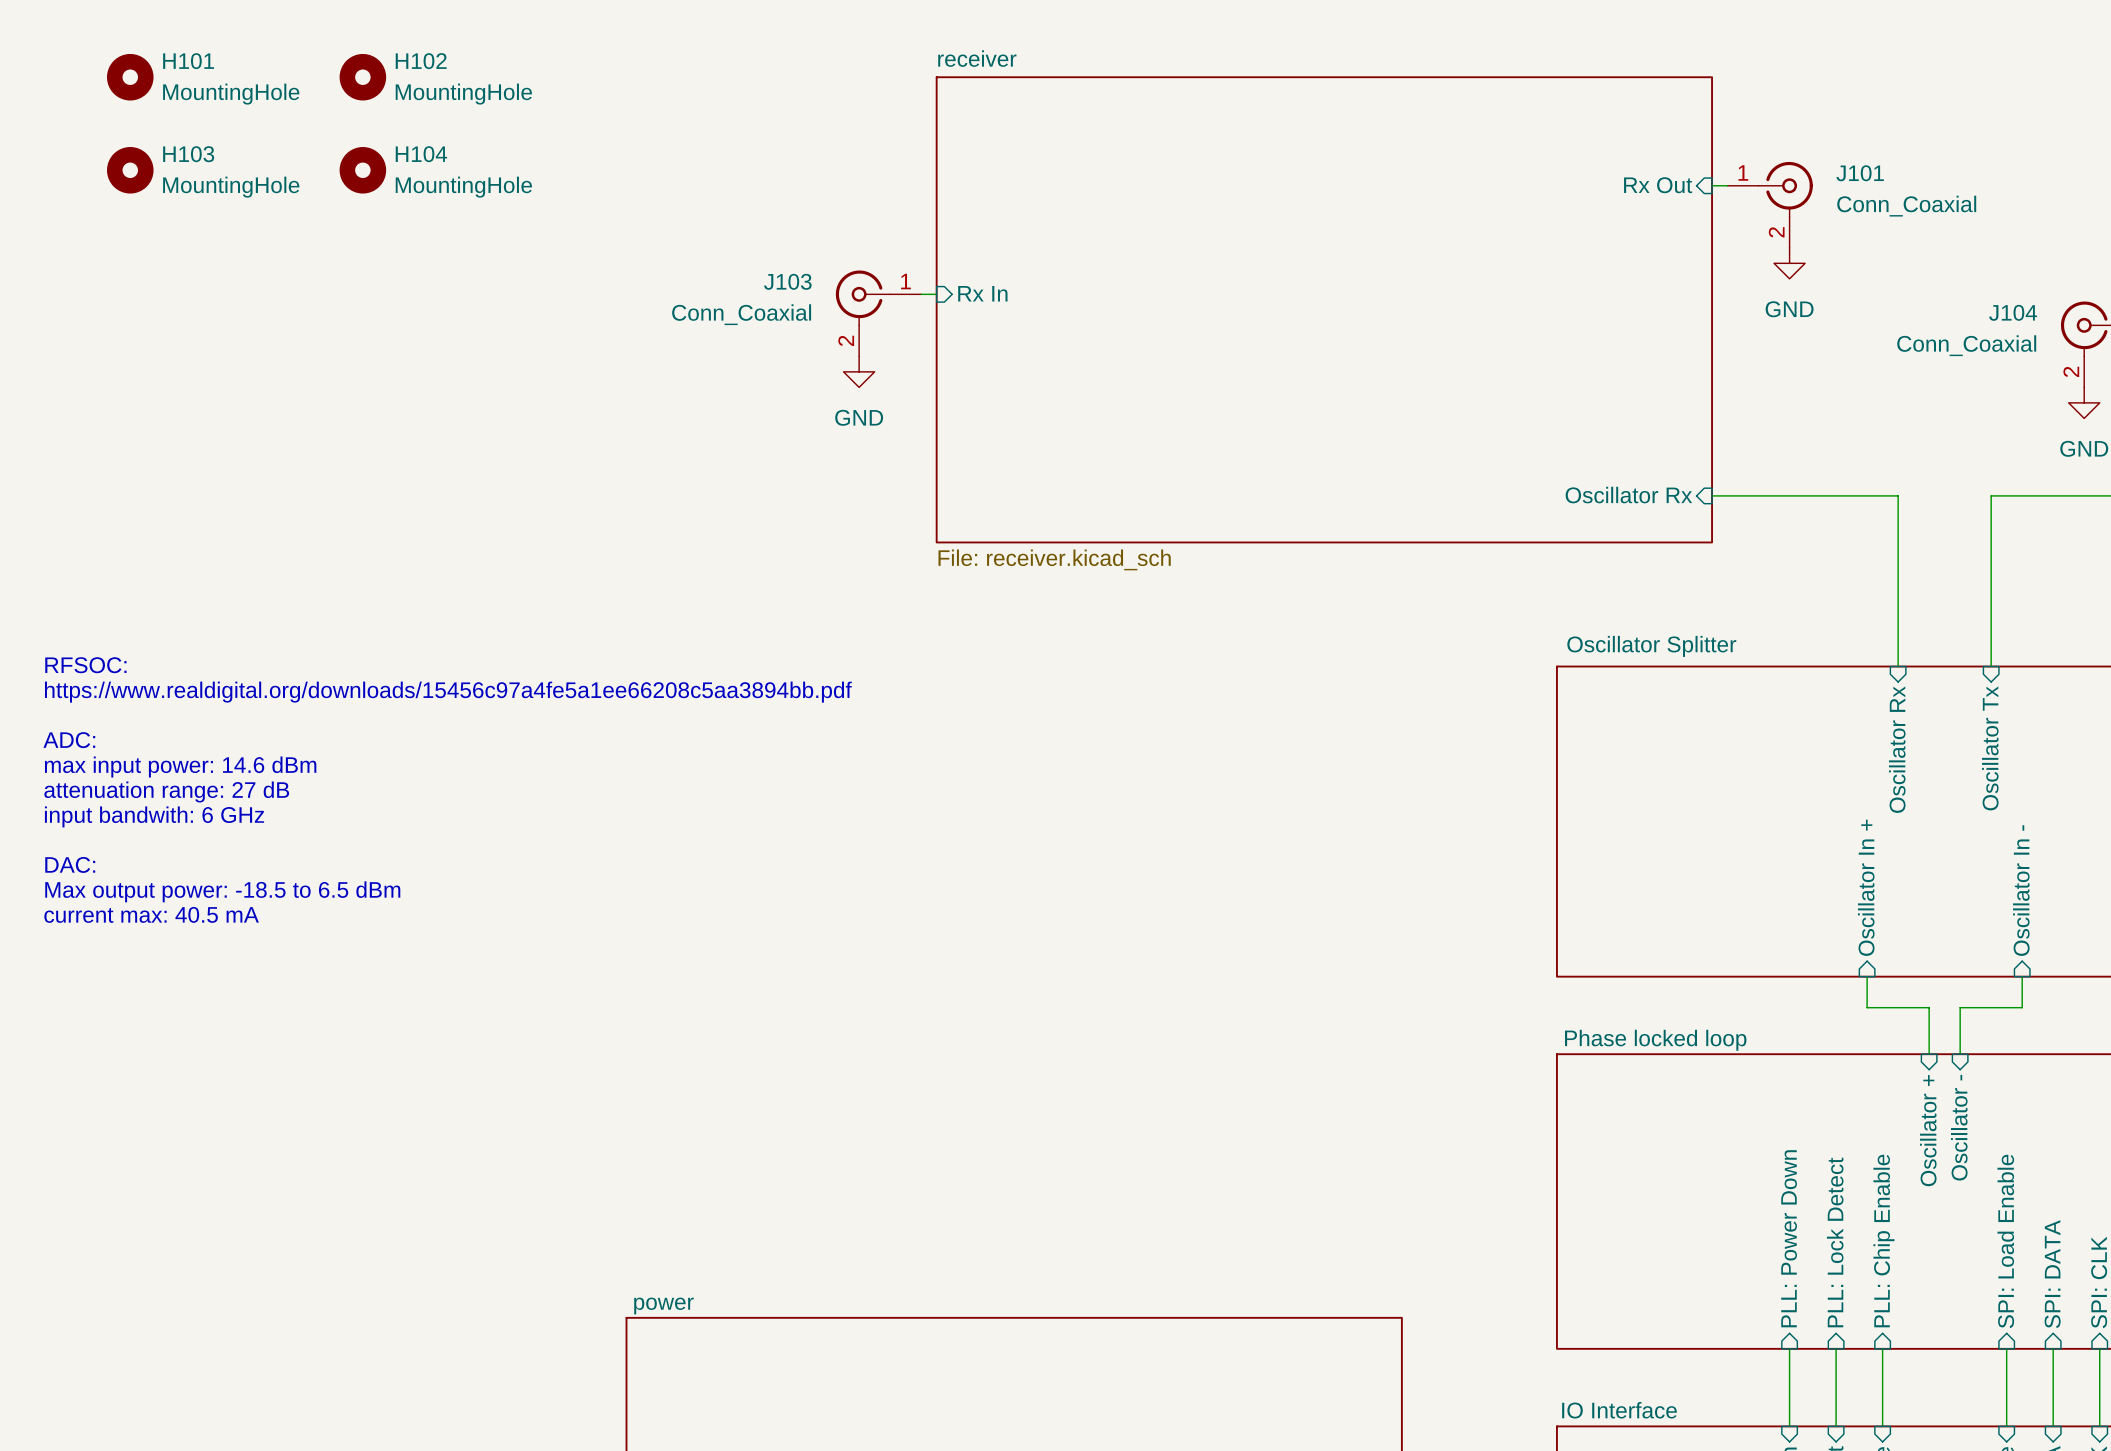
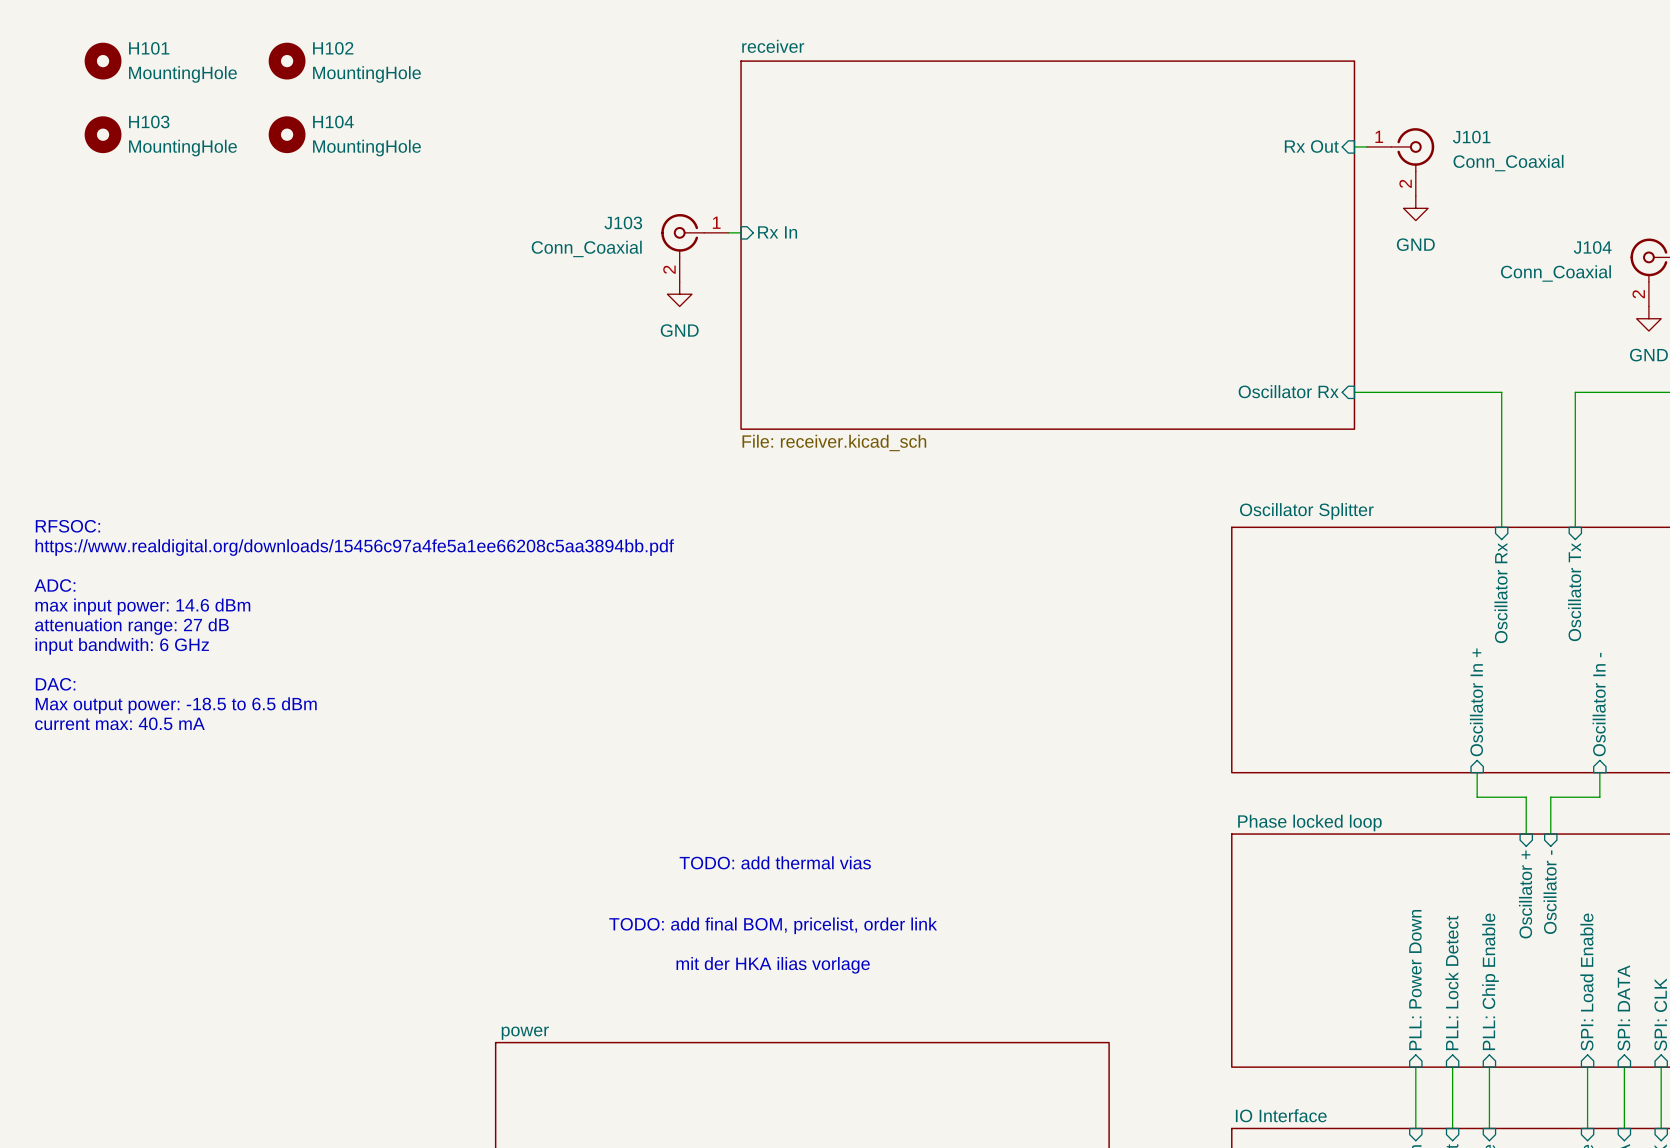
text: none -> TODO: add thermal vias (775, 862)
text: none -> TODO: add final BOM, pricelist, order link (773, 925)
text: none -> mit der HKA ilias vorlage (773, 965)

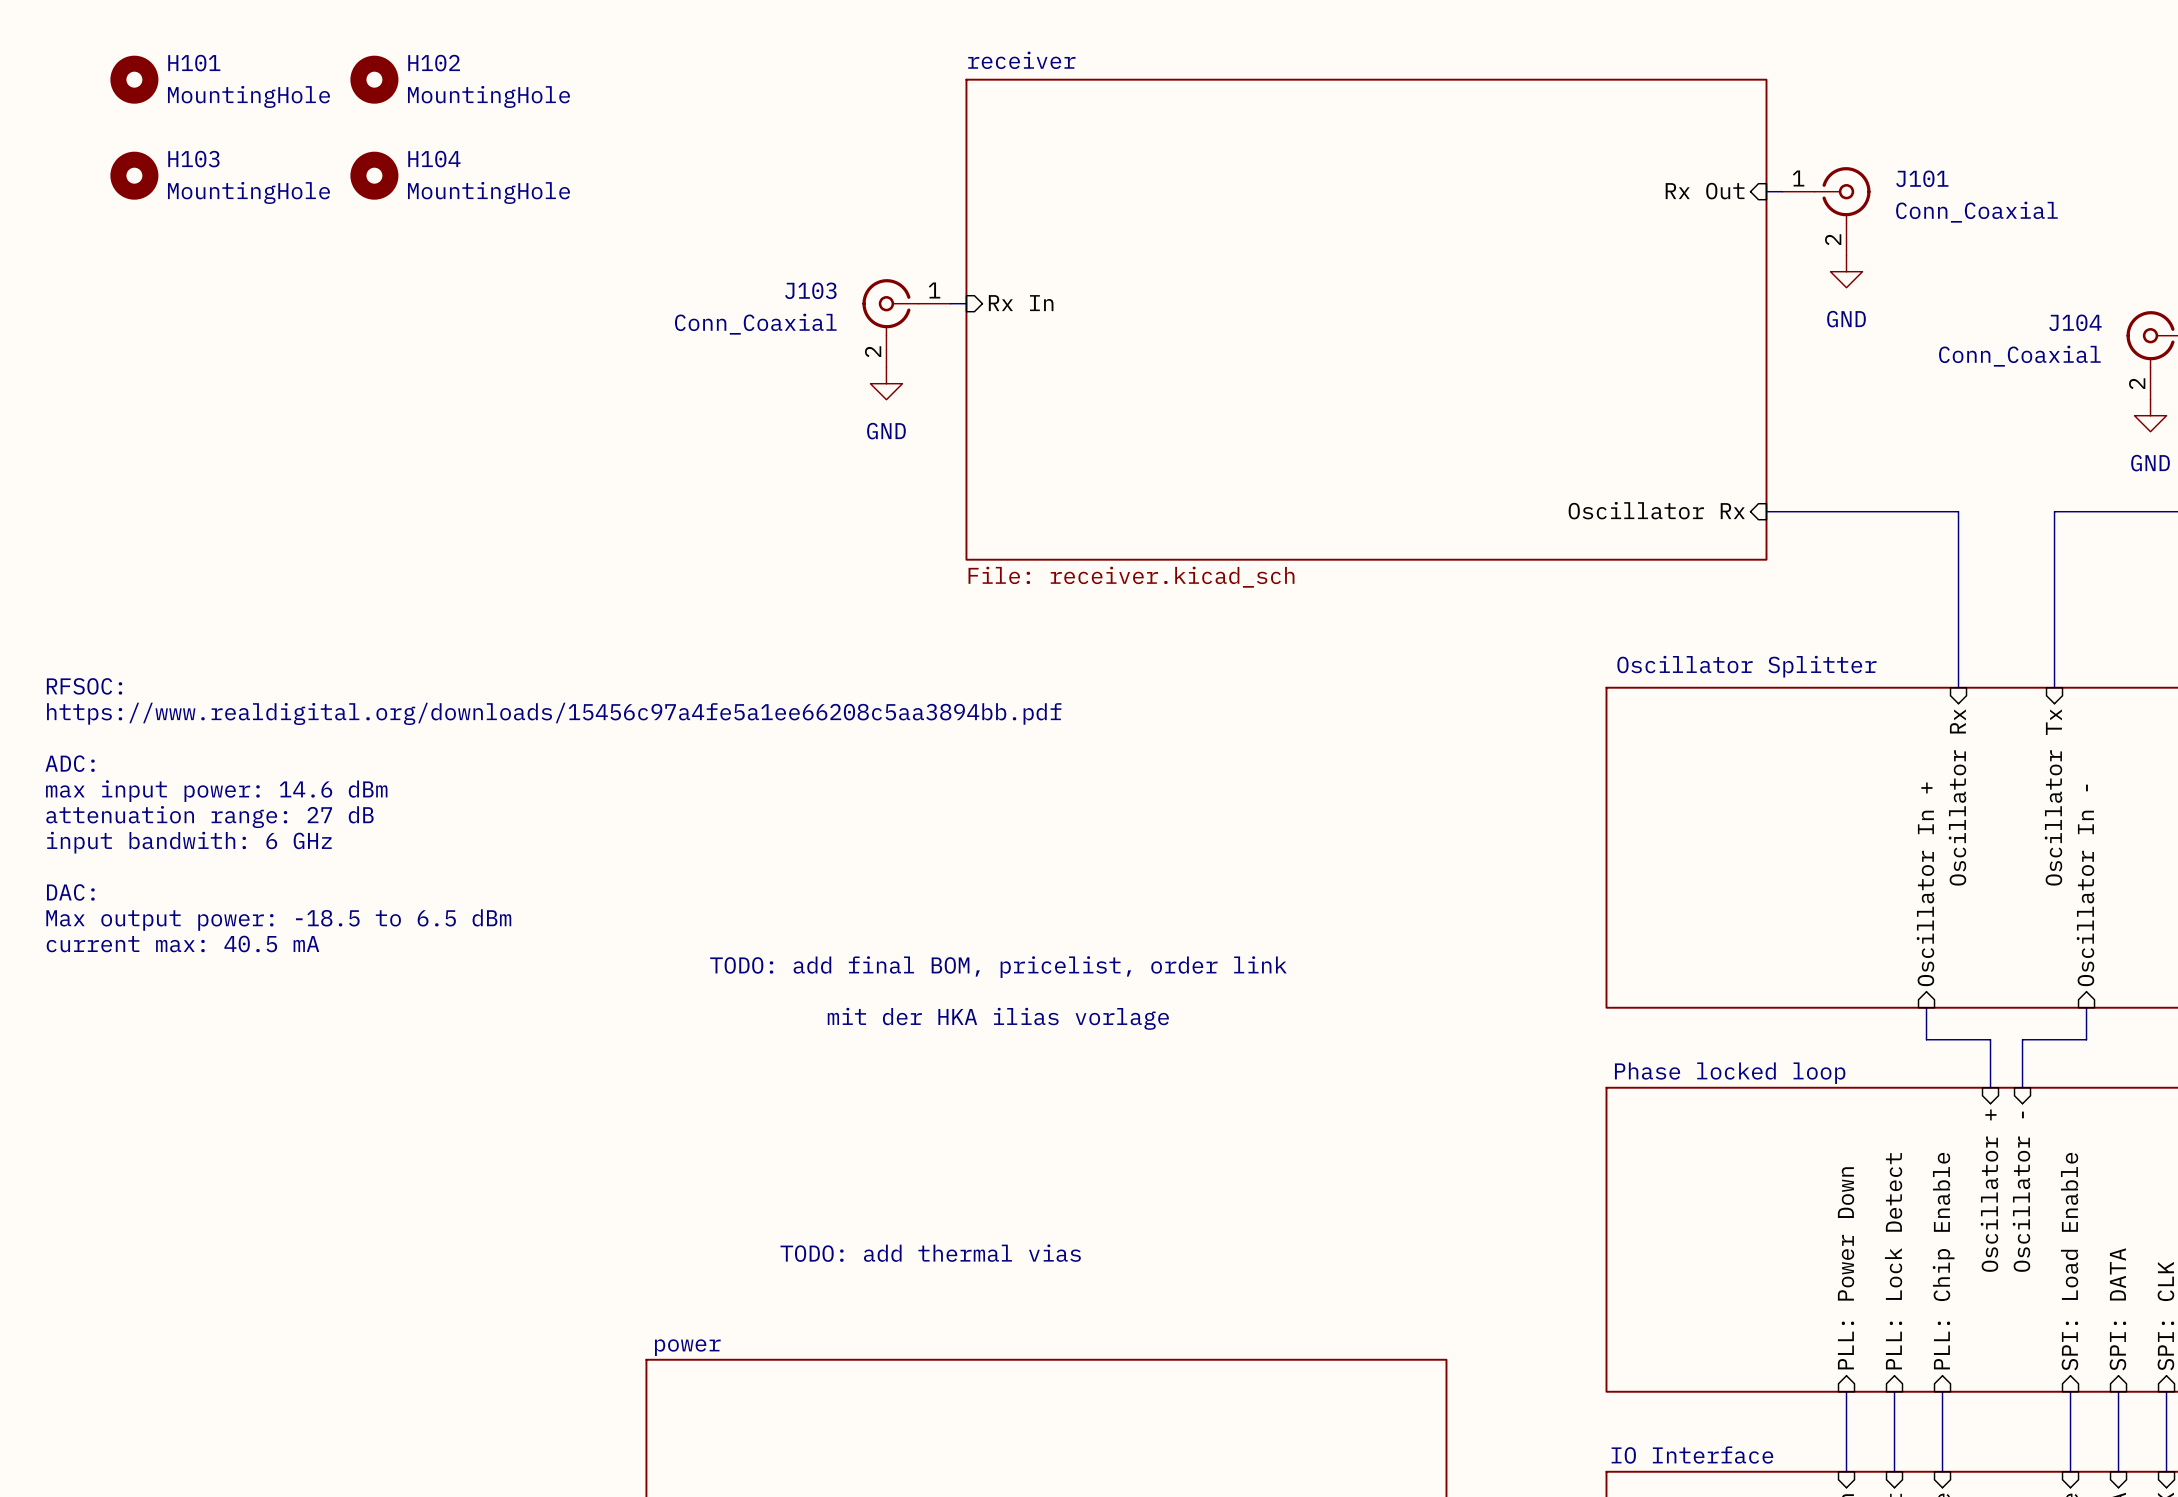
text position: TODO: add thermal vias (775, 862) -> TODO: add thermal vias (930, 1253)
text position: TODO: add final BOM, pricelist, order link (773, 925) -> TODO: add final BOM, pricelist, order link (998, 967)
text position: mit der HKA ilias vorlage (773, 965) -> mit der HKA ilias vorlage (998, 1018)

